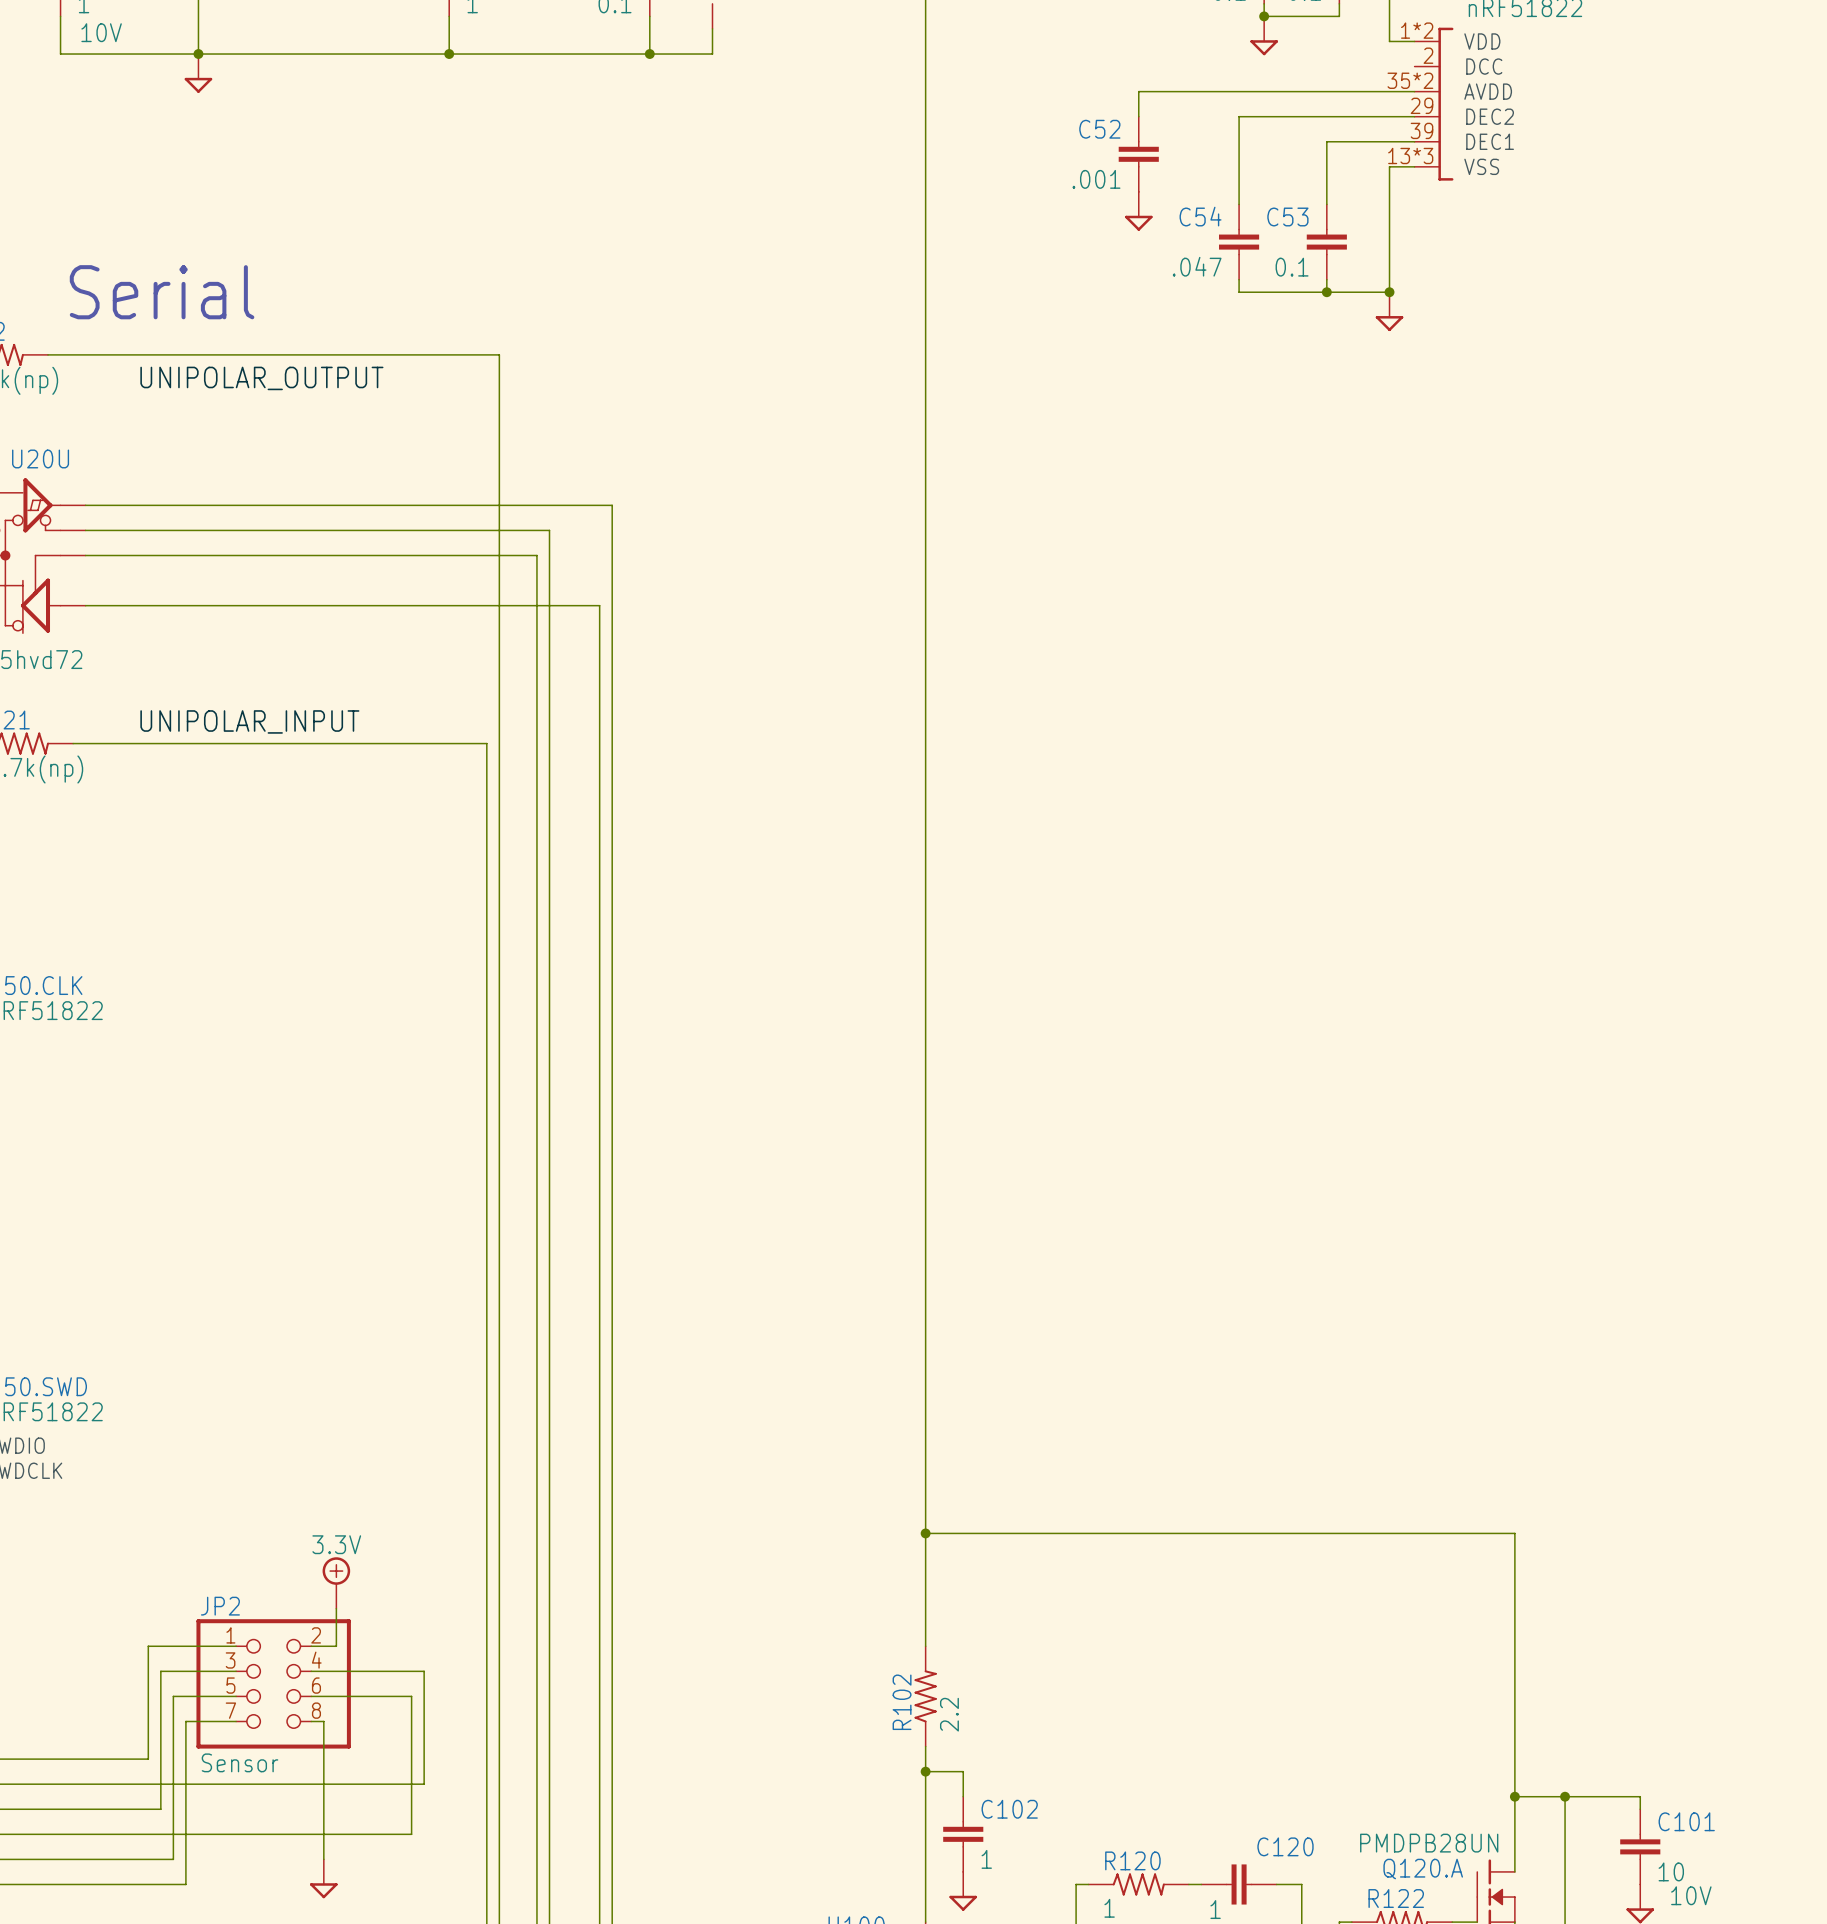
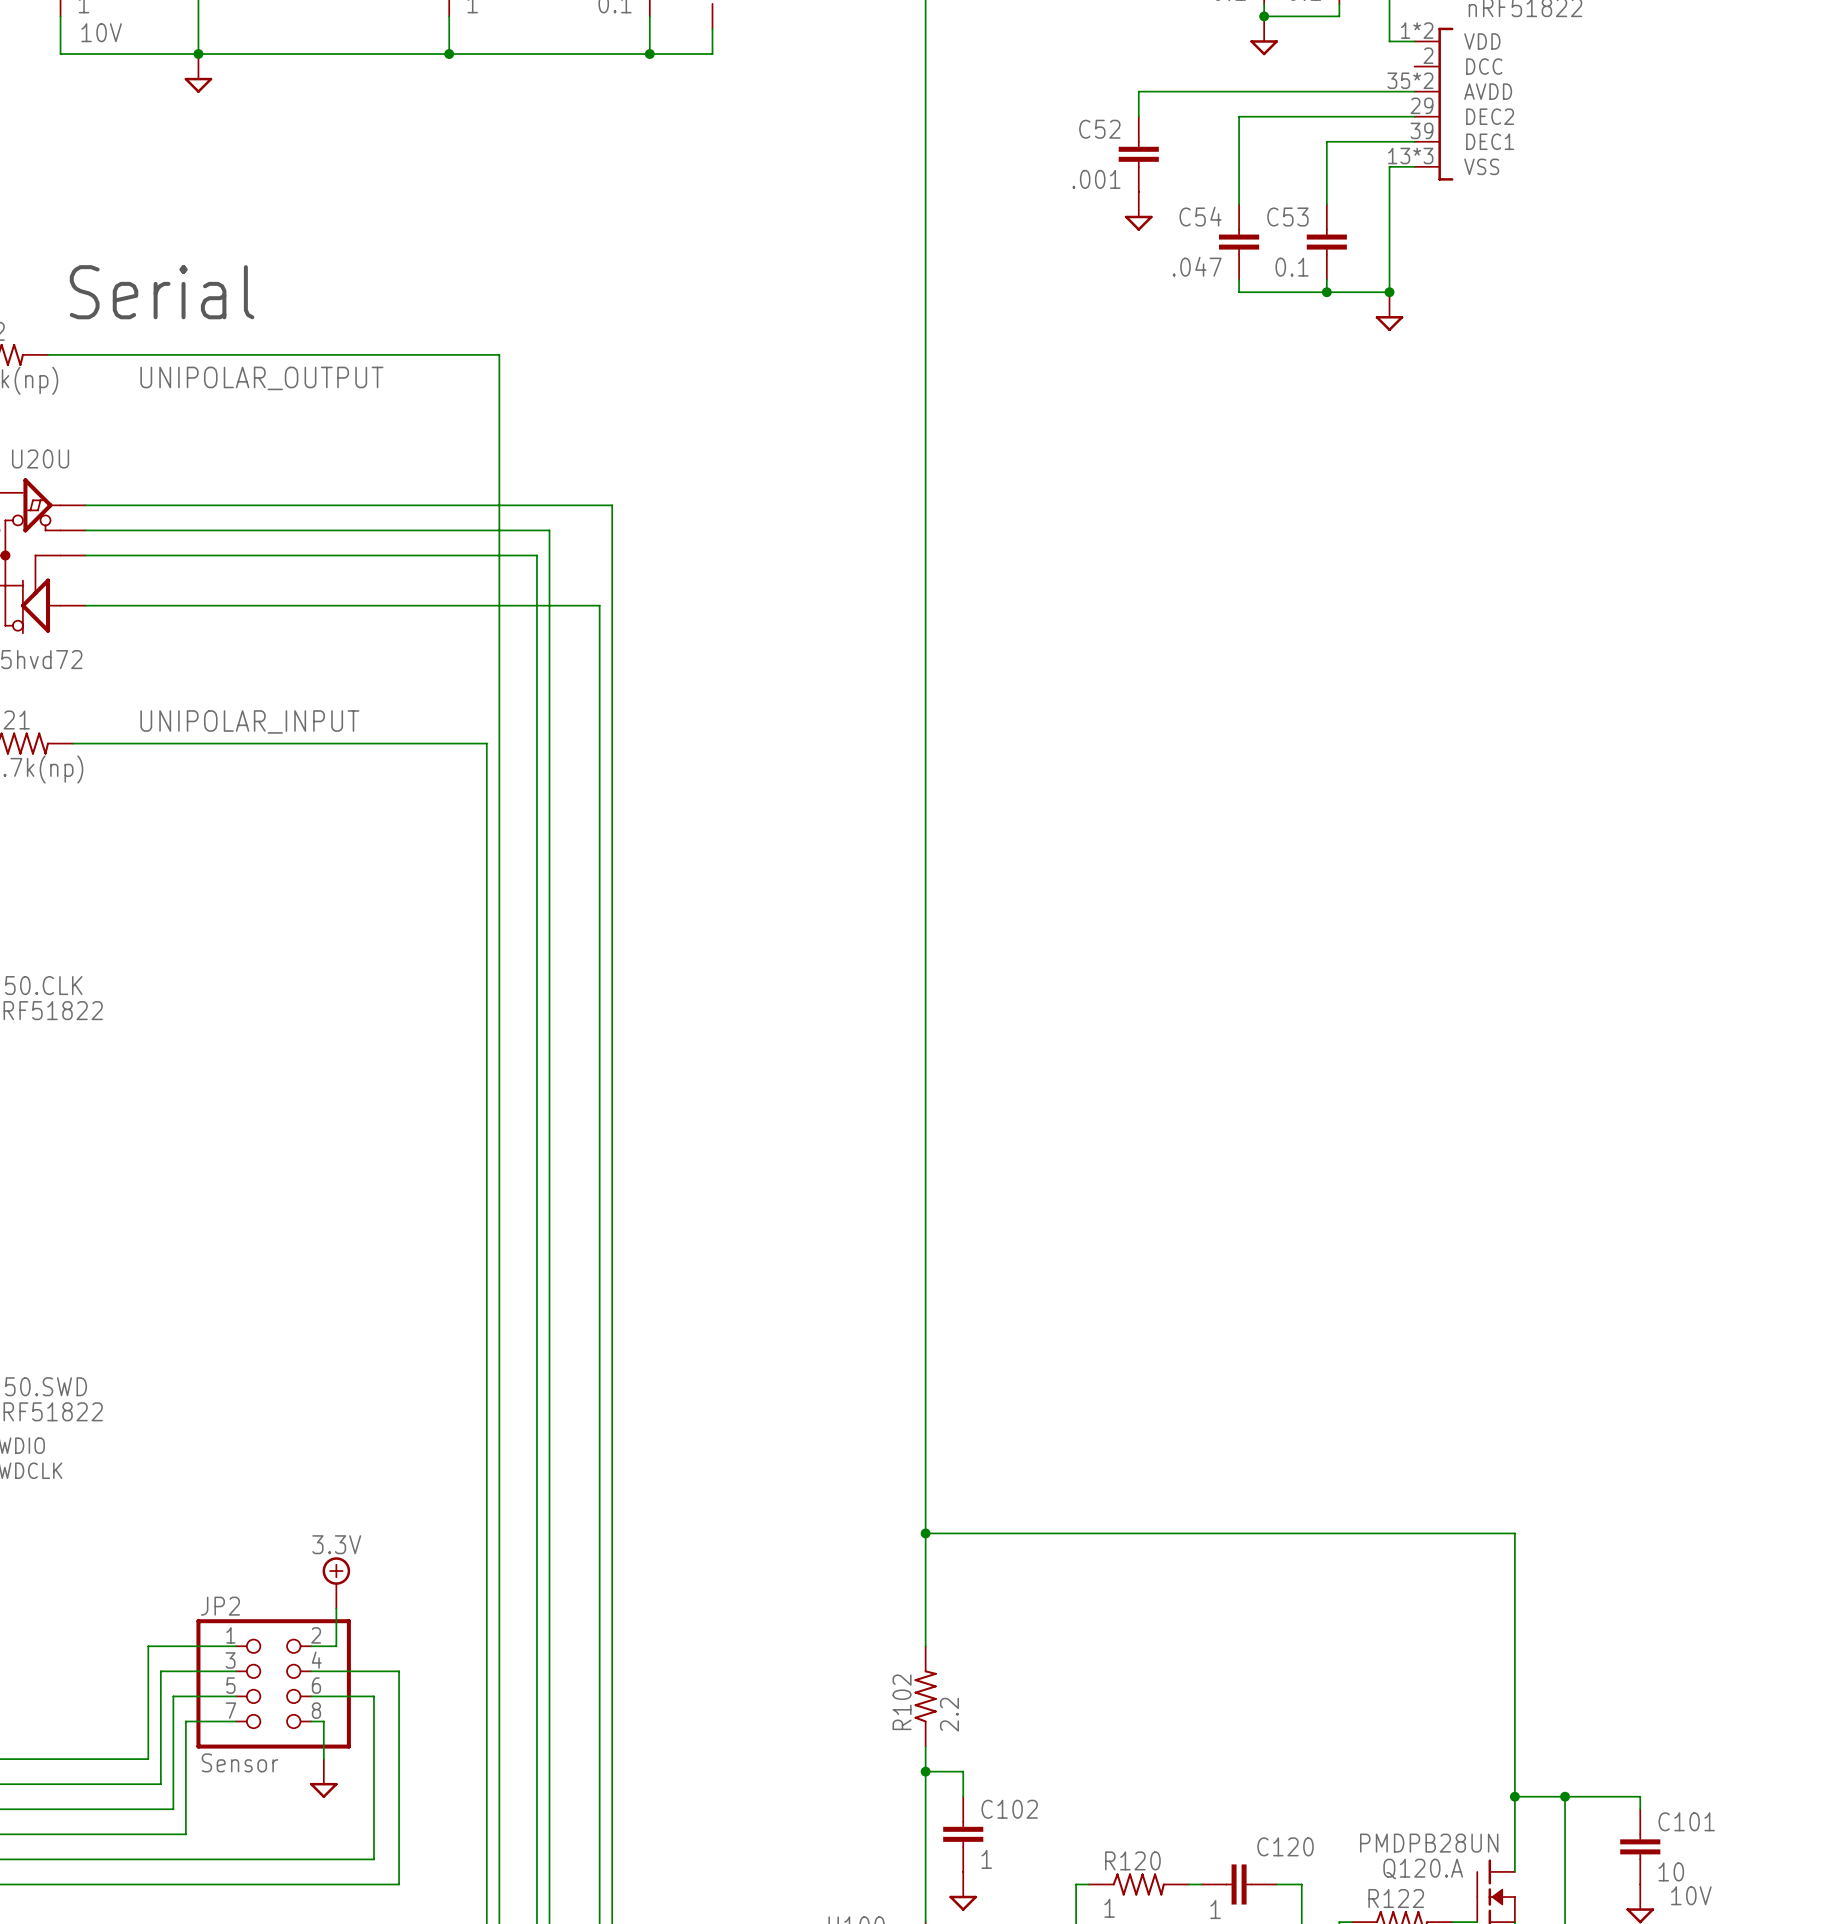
wire: (399, 1671) (424, 1671) (424, 1784) (160, 1784) (160, 1809) -> (399, 1671) (399, 1884) (185, 1884)
wire: (373, 1696) (411, 1696) (411, 1834) (185, 1834) (185, 1884) -> (373, 1696) (373, 1859) (173, 1859)
wire: (323, 1759) (323, 1859) -> none
wire: (173, 1809) (173, 1859) -> (173, 1809) (160, 1809)
power symbol position: (323, 1878) -> (323, 1778)

